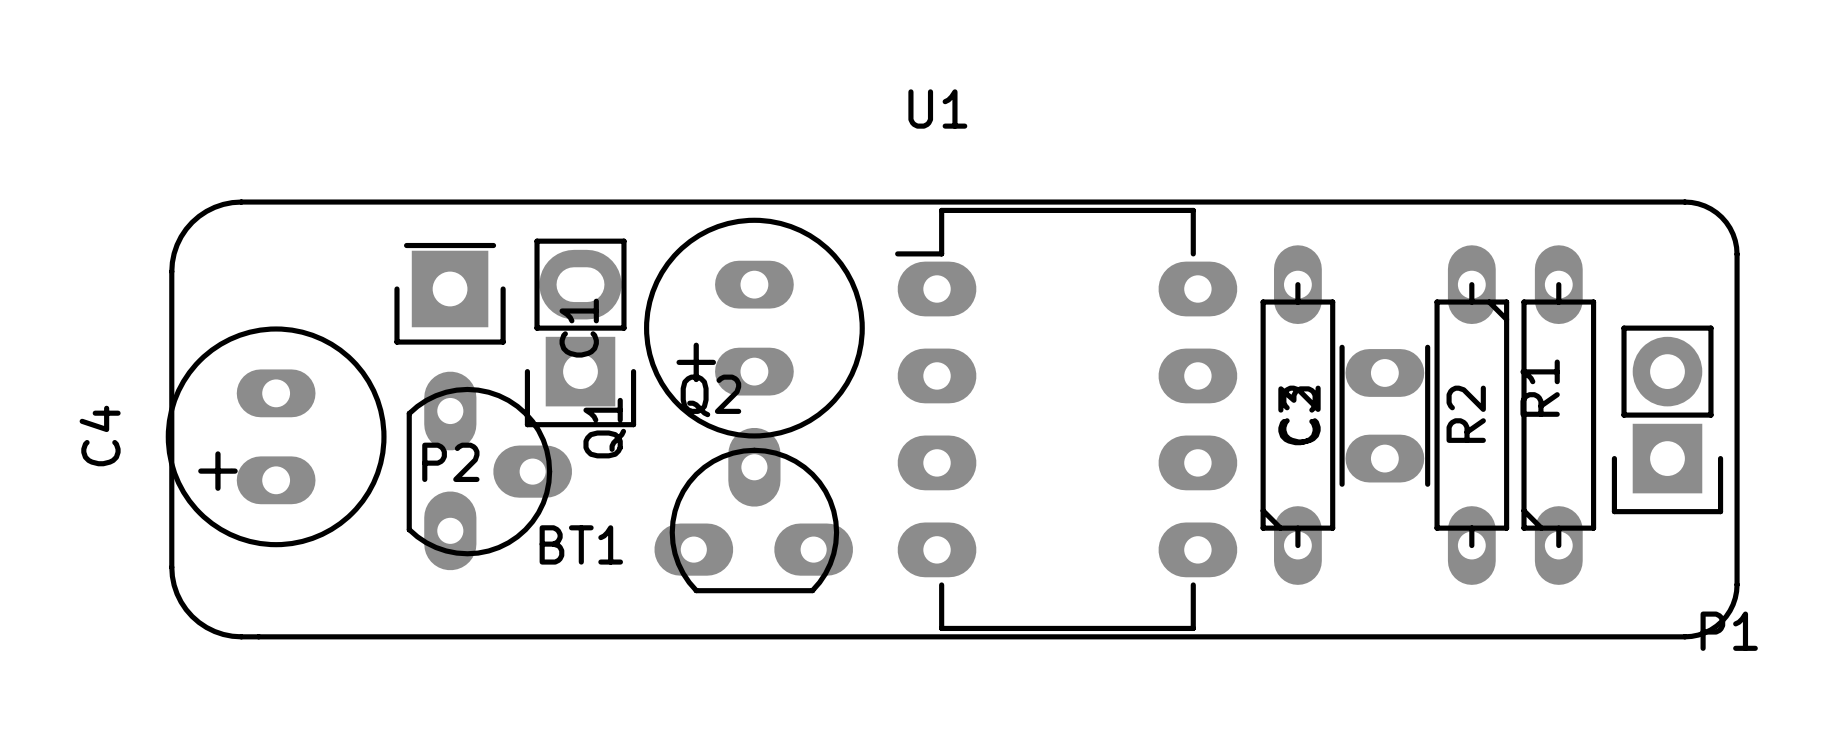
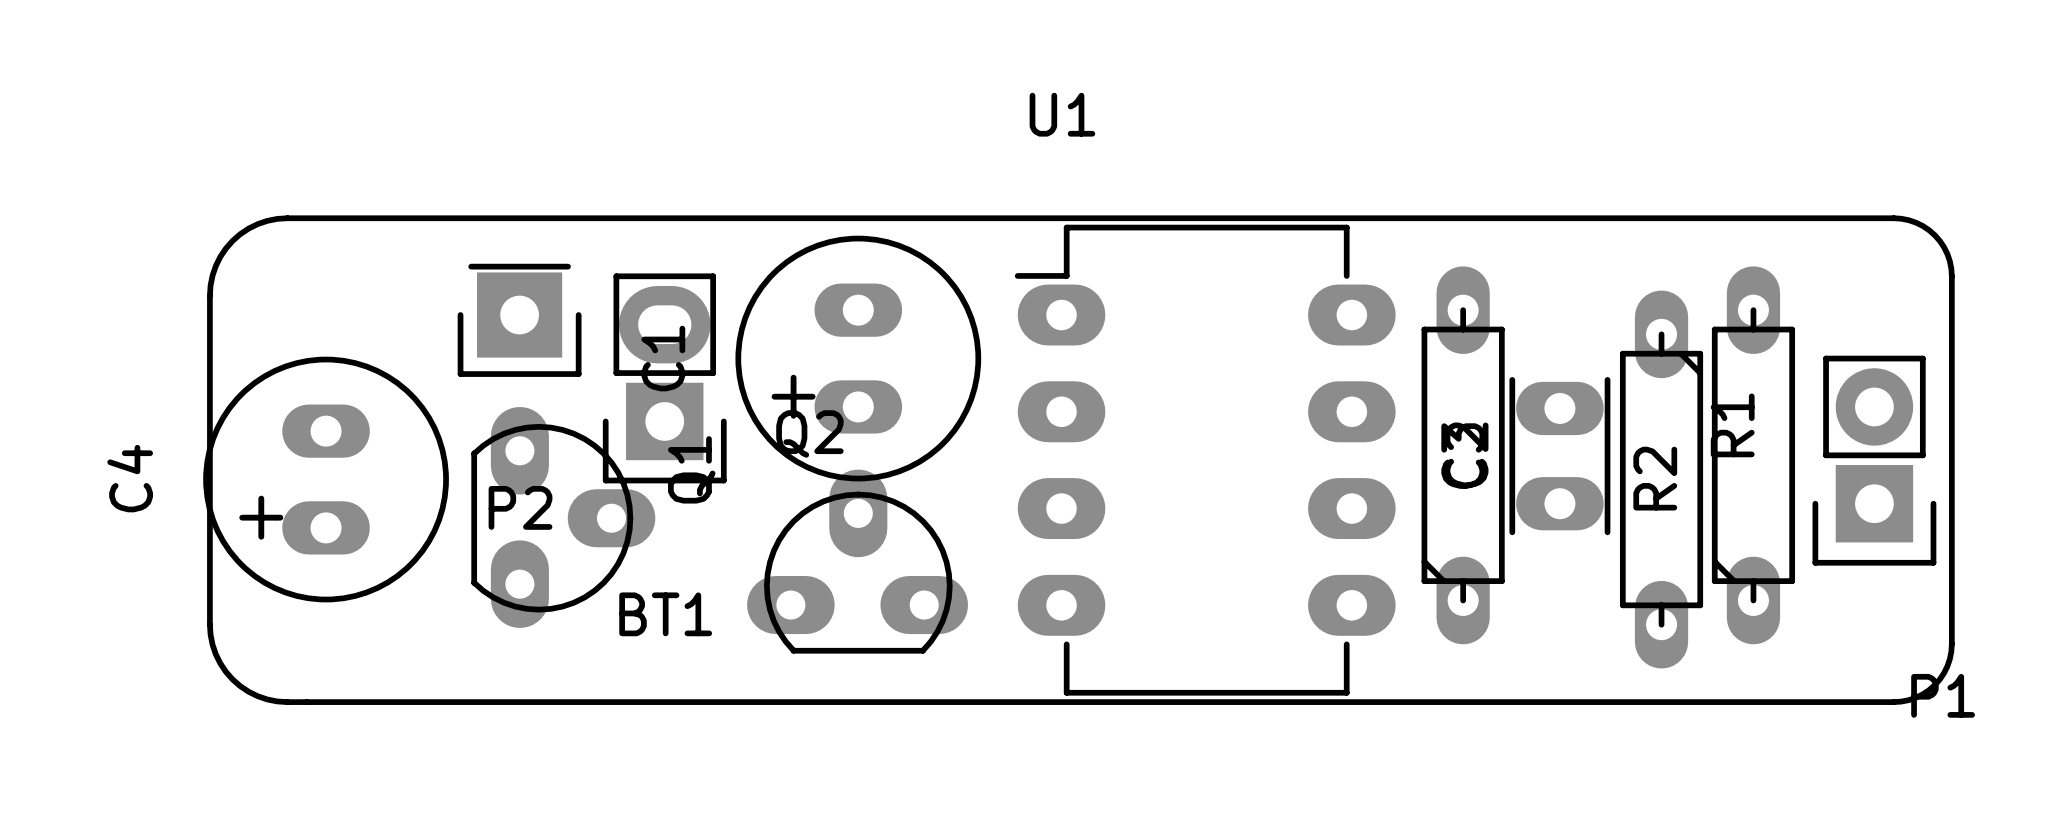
BT1 position: (580, 332) -> (664, 378)
R2 position: (1471, 415) -> (1661, 479)

